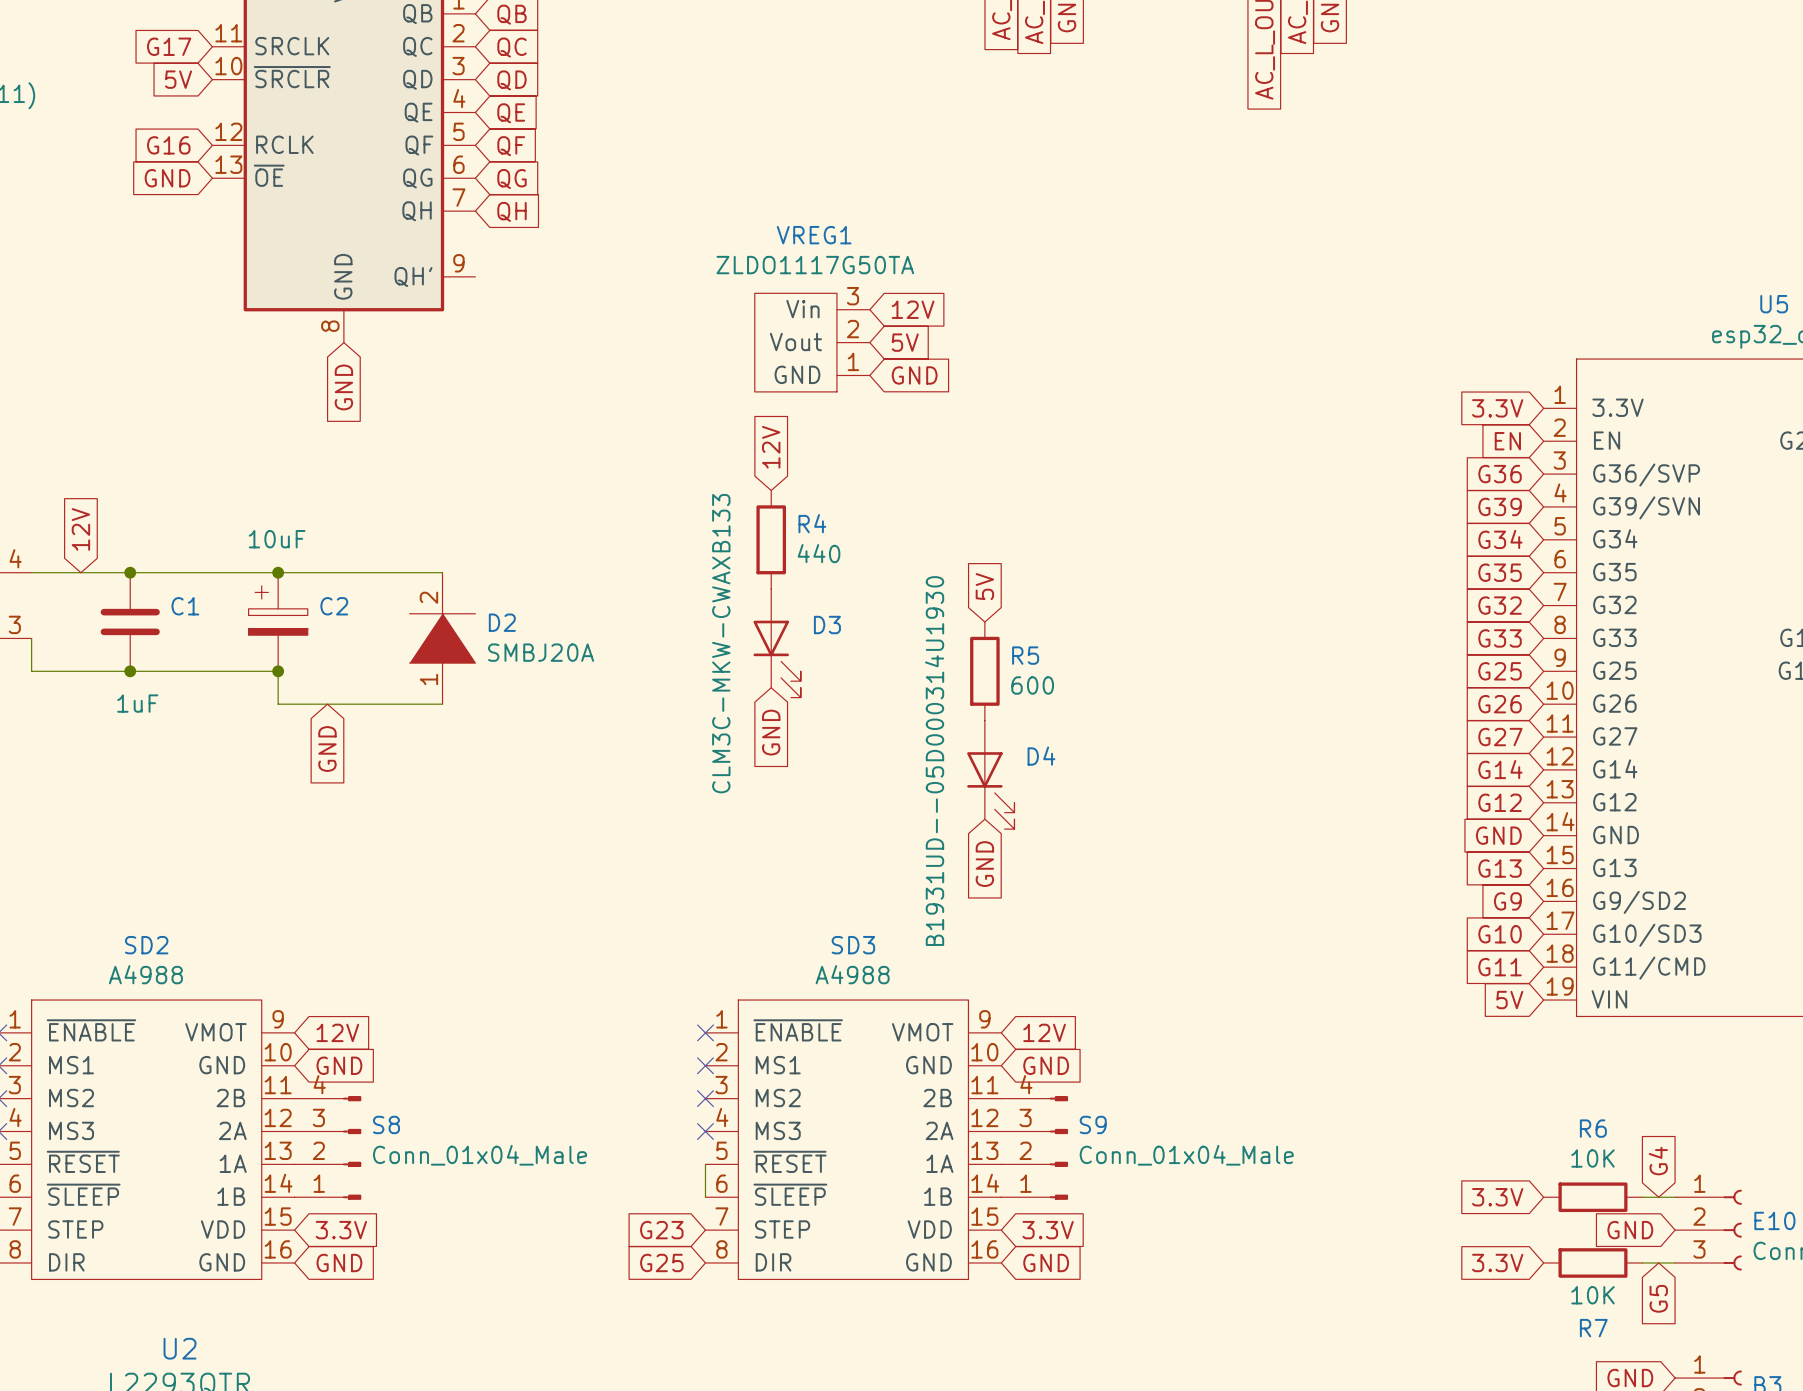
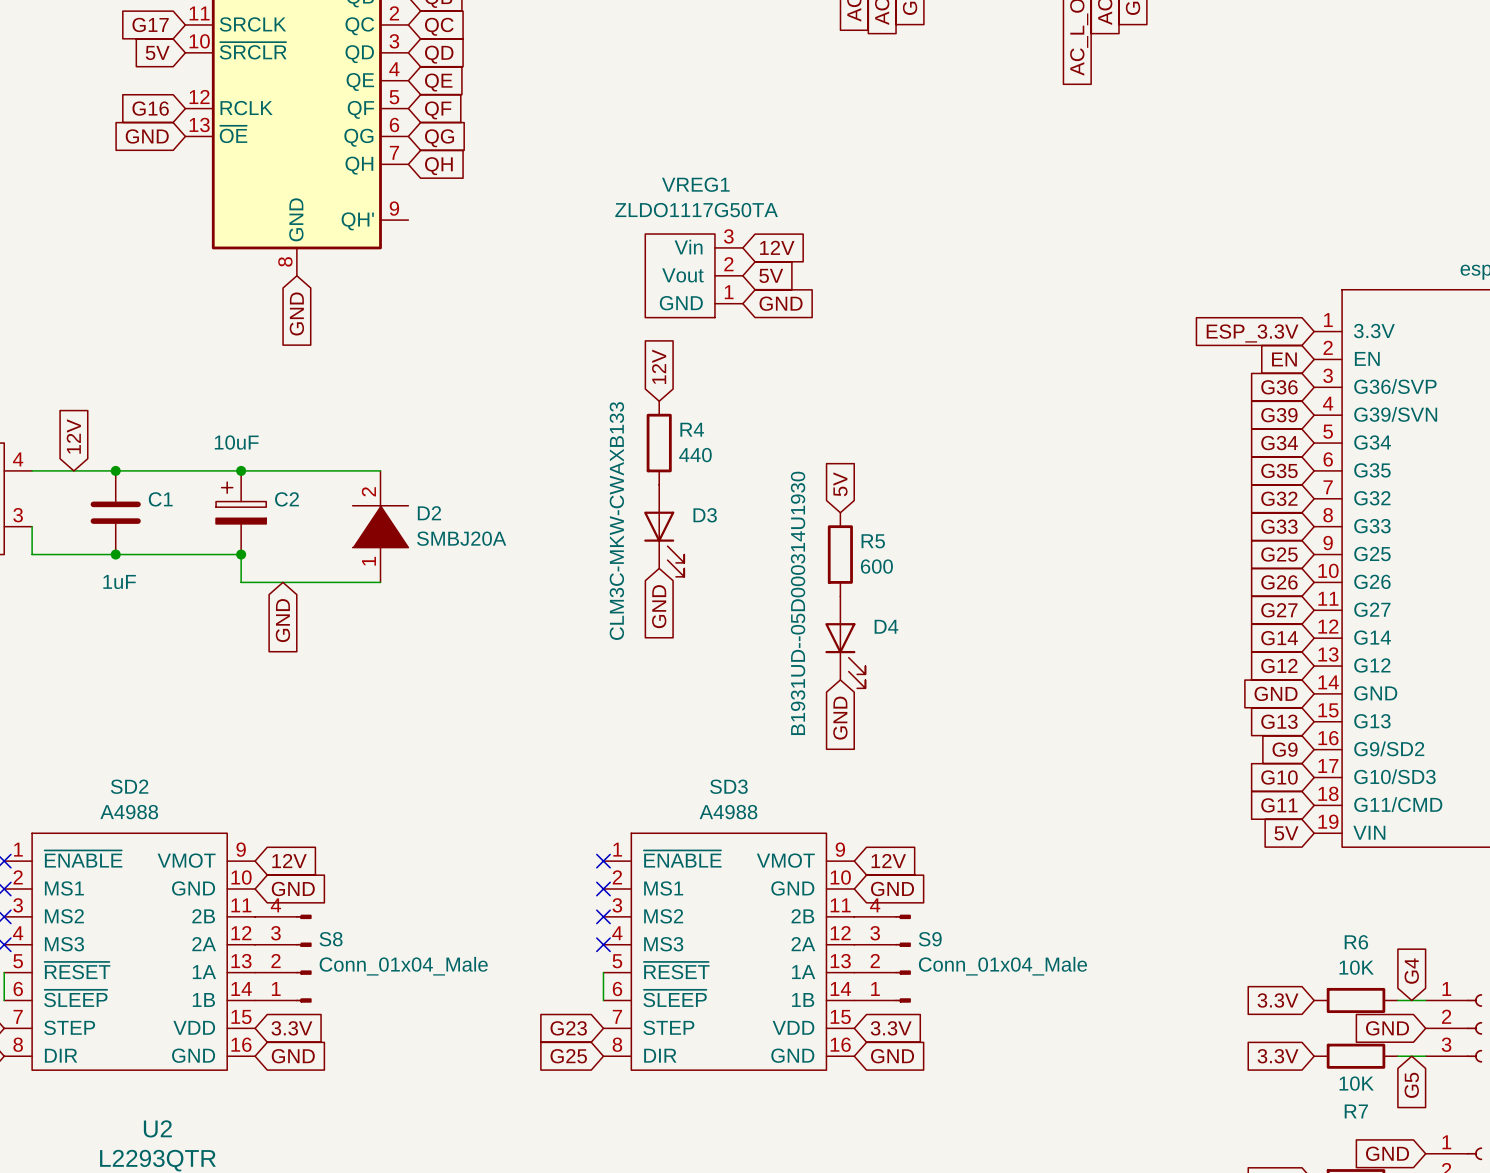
global label: 3.3V (1497, 408) -> ESP_3.3V (1252, 333)

